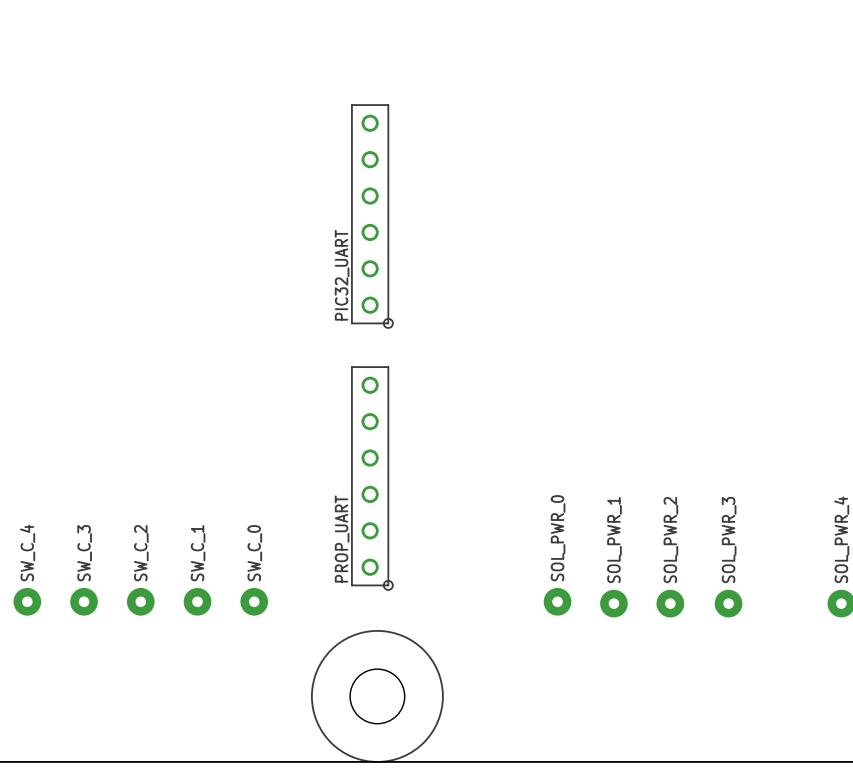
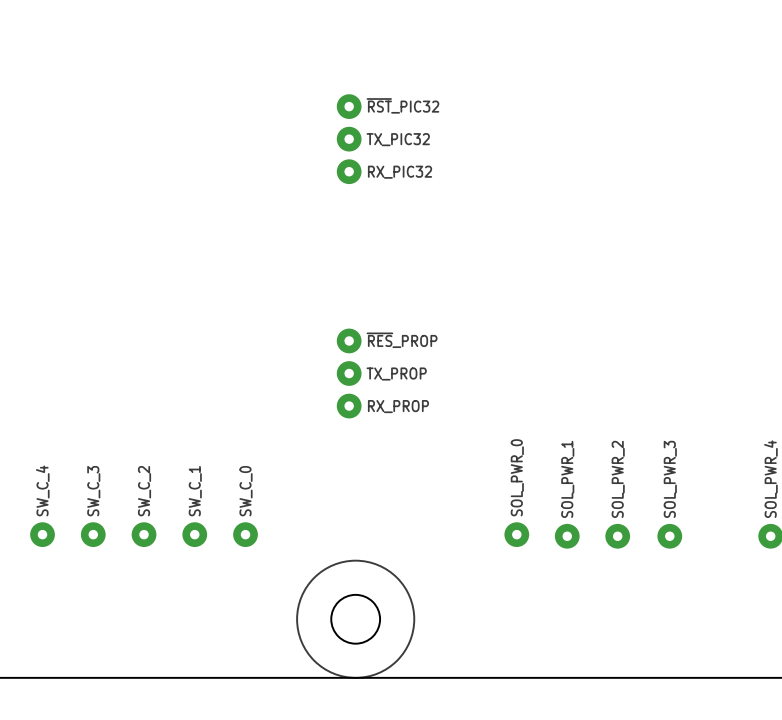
~{RST}_PIC32: none -> (349, 106)
TX_PIC32: none -> (349, 139)
RX_PIC32: none -> (349, 171)
PIC32_UART: (372, 216) -> none
~{RES}_PROP: none -> (349, 340)
TX_PROP: none -> (349, 373)
RX_PROP: none -> (349, 406)
PROP_UART: (372, 478) -> none

